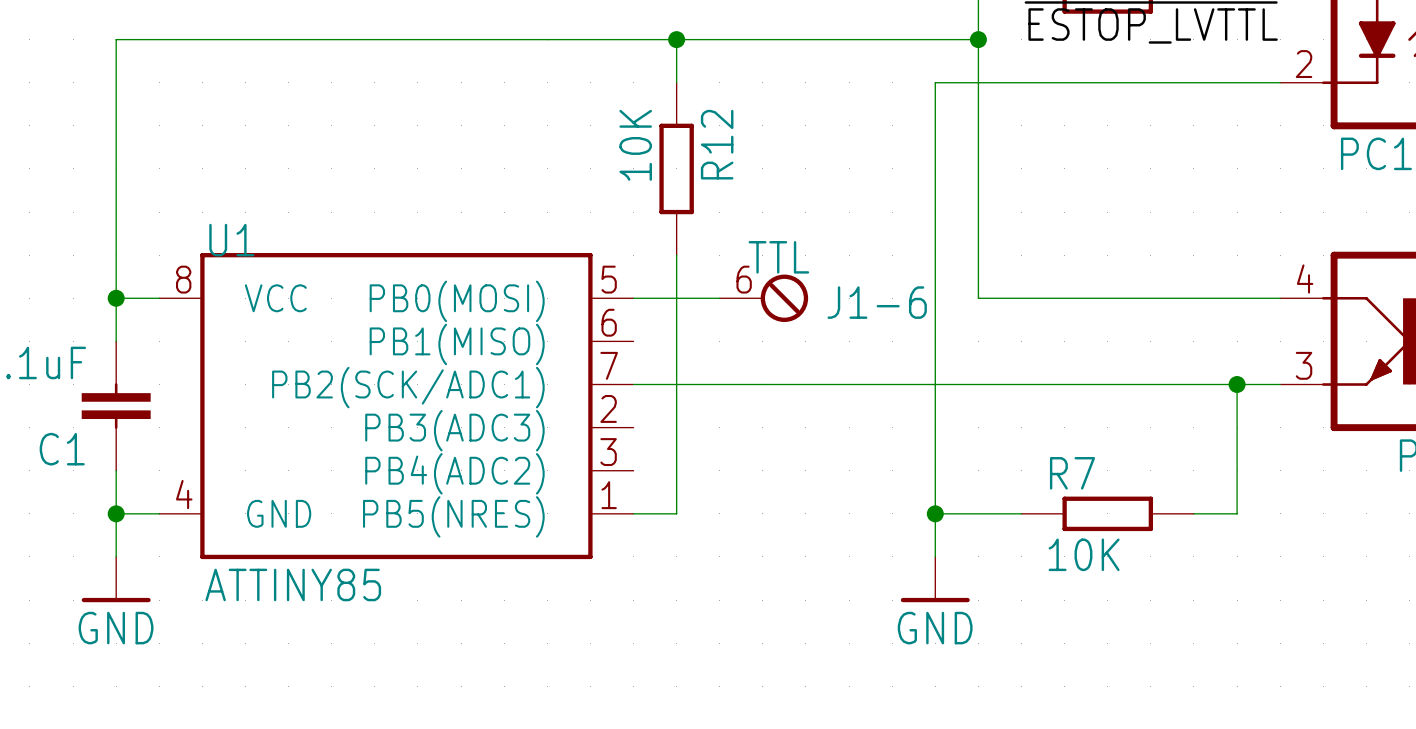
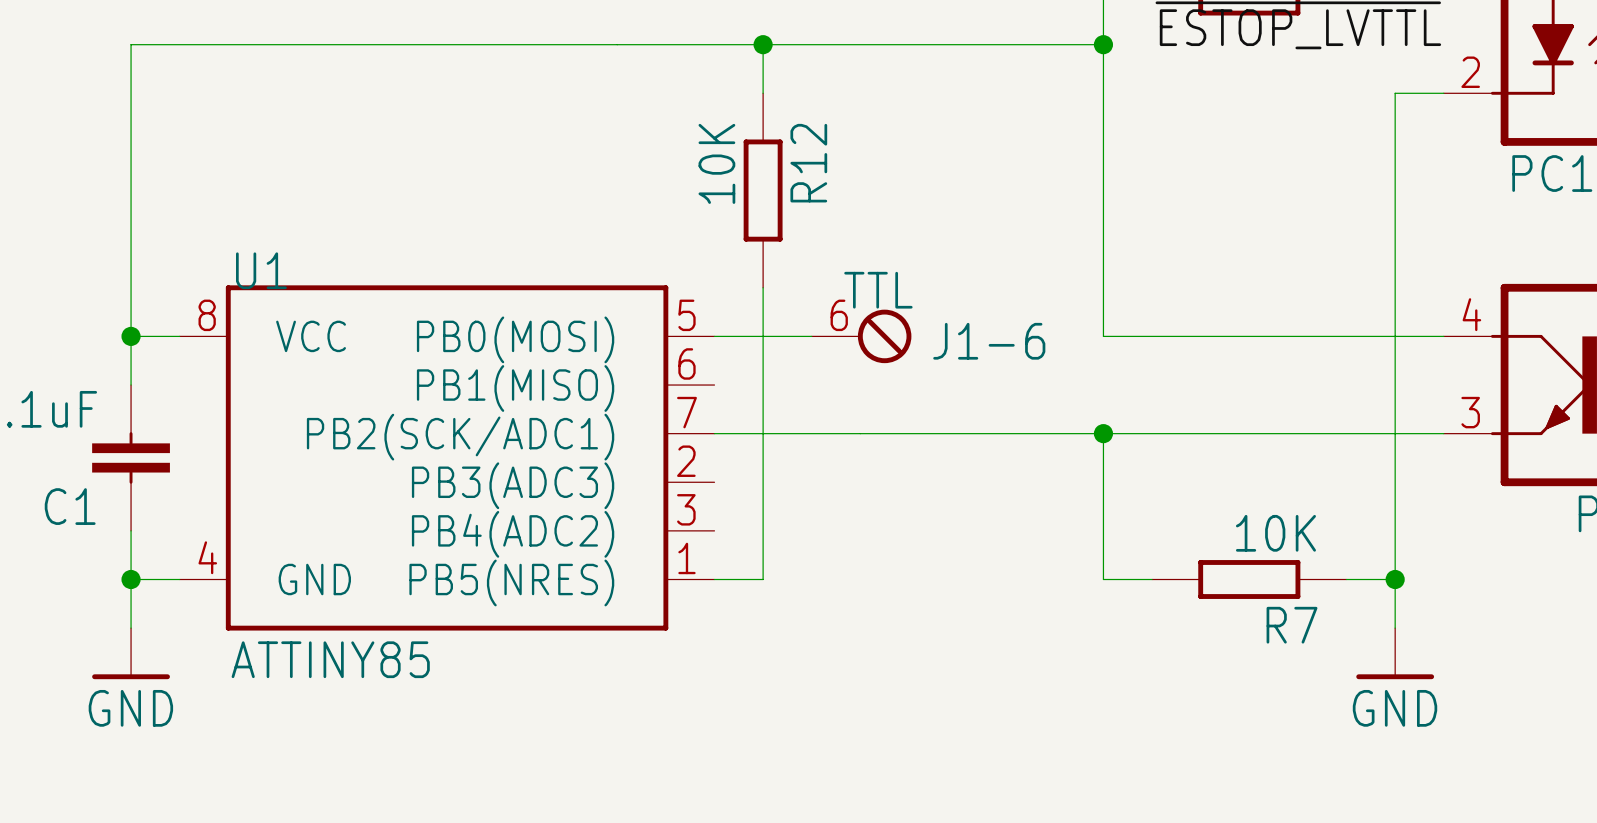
wire: (1237, 82) (935, 82) (935, 556) -> (1395, 93) (1395, 433)
junction: none -> (1103, 433)
junction: (1237, 384) -> none
R7 name position: R7 (1072, 473) -> R7 (1292, 625)
wire: (935, 513) (978, 513) -> (1103, 433) (1103, 579)
junction: (935, 513) -> none
wire: none -> (1395, 579) (1395, 628)
junction: none -> (1395, 579)
R7 value position: 10K (1084, 554) -> 10K (1275, 533)
power symbol position: GND (935, 579) -> GND (1395, 653)

